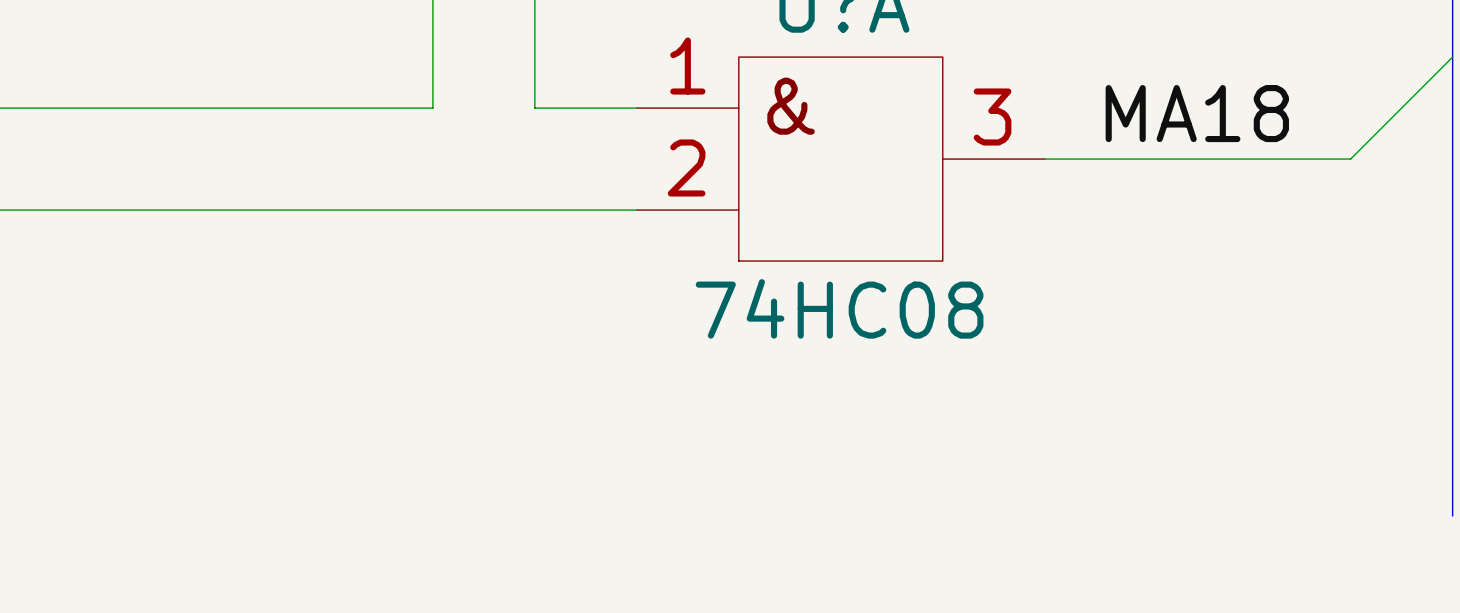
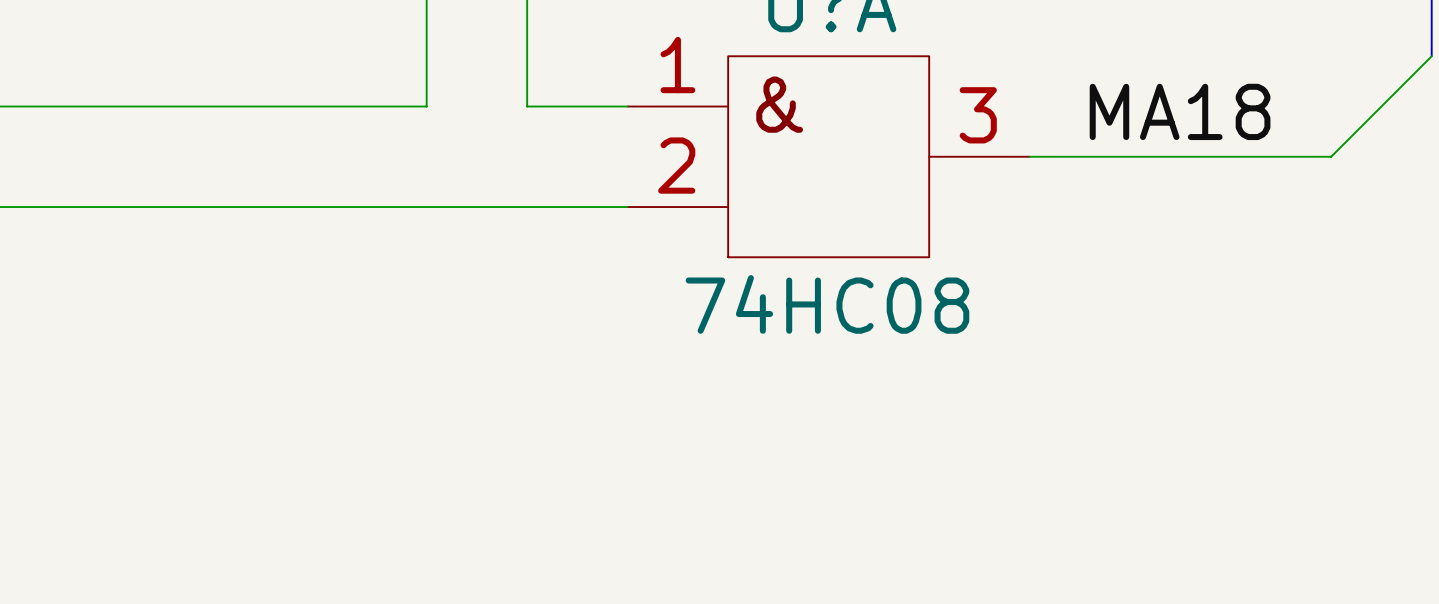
bus: (1452, 57) (1452, 515) -> none

